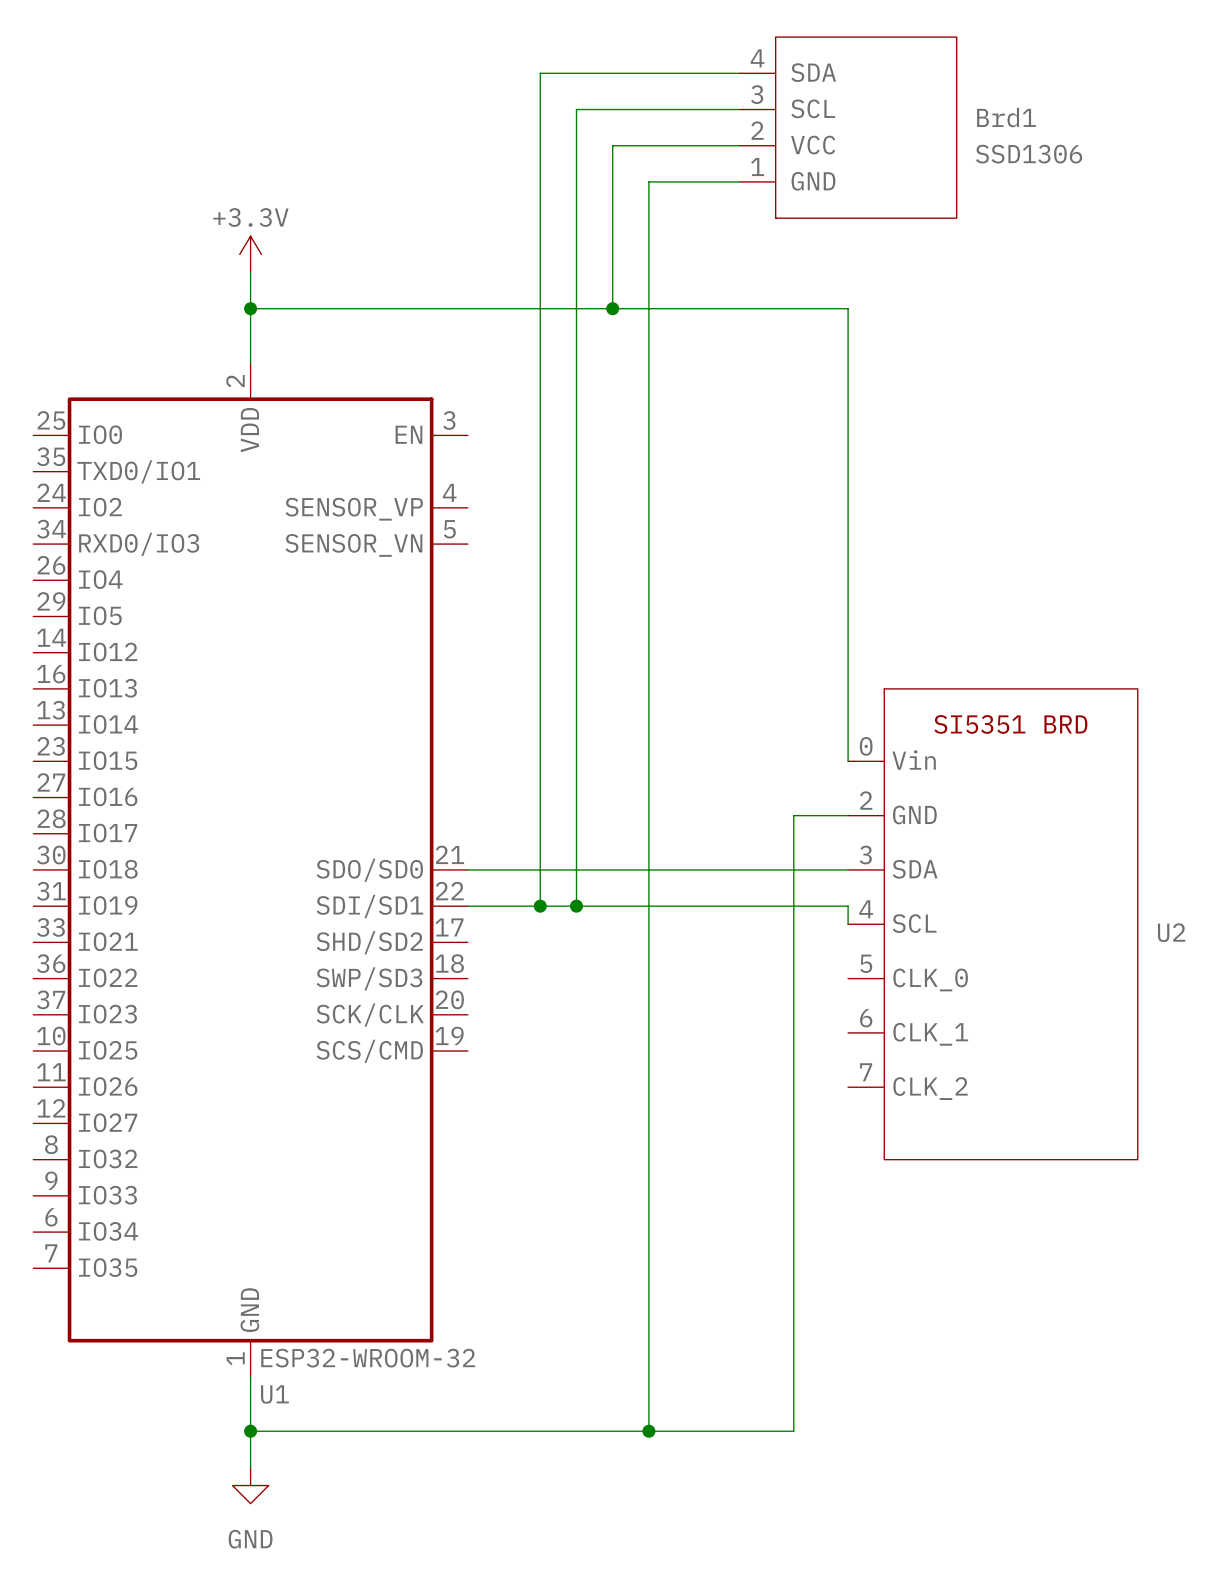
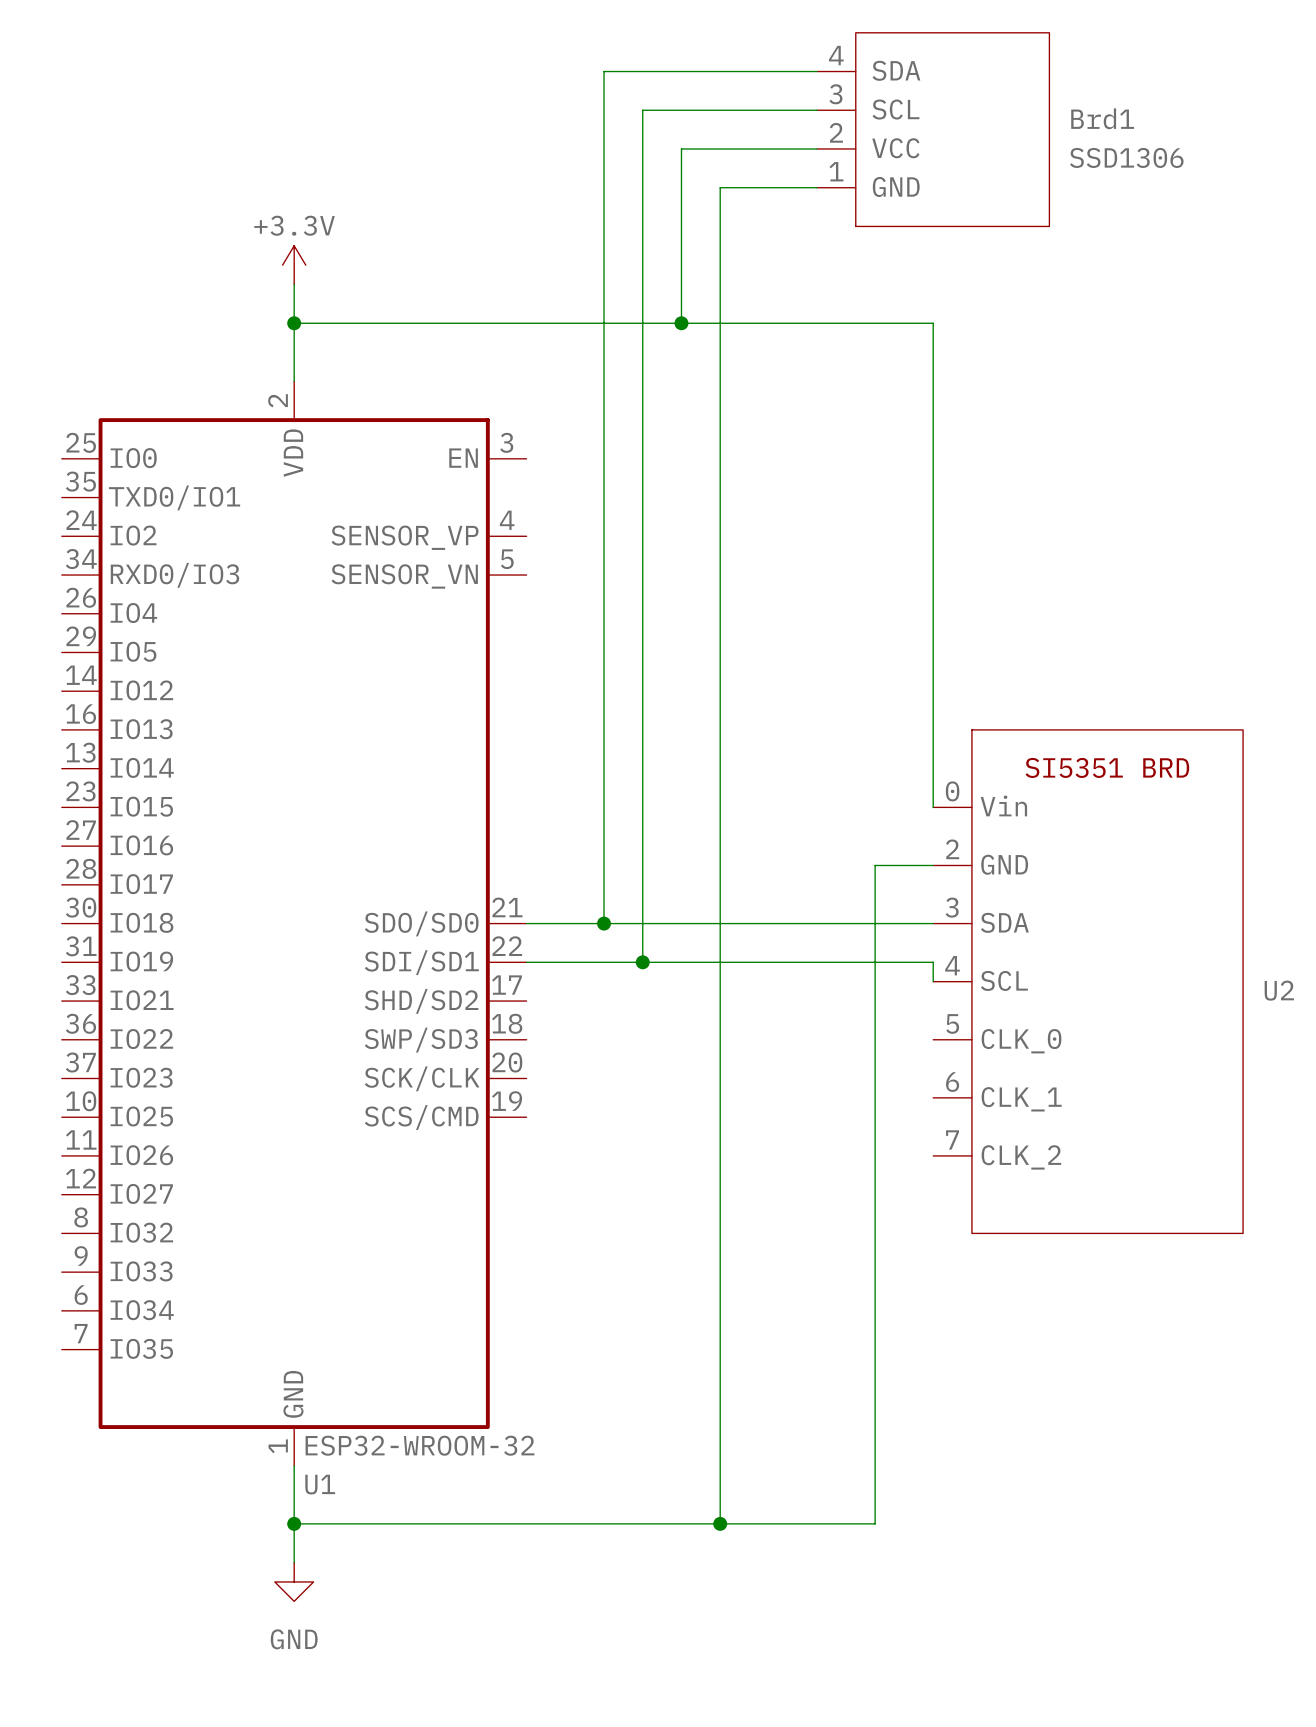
wire: (540, 869) (540, 906) -> none
junction position: (540, 906) -> (604, 923)

